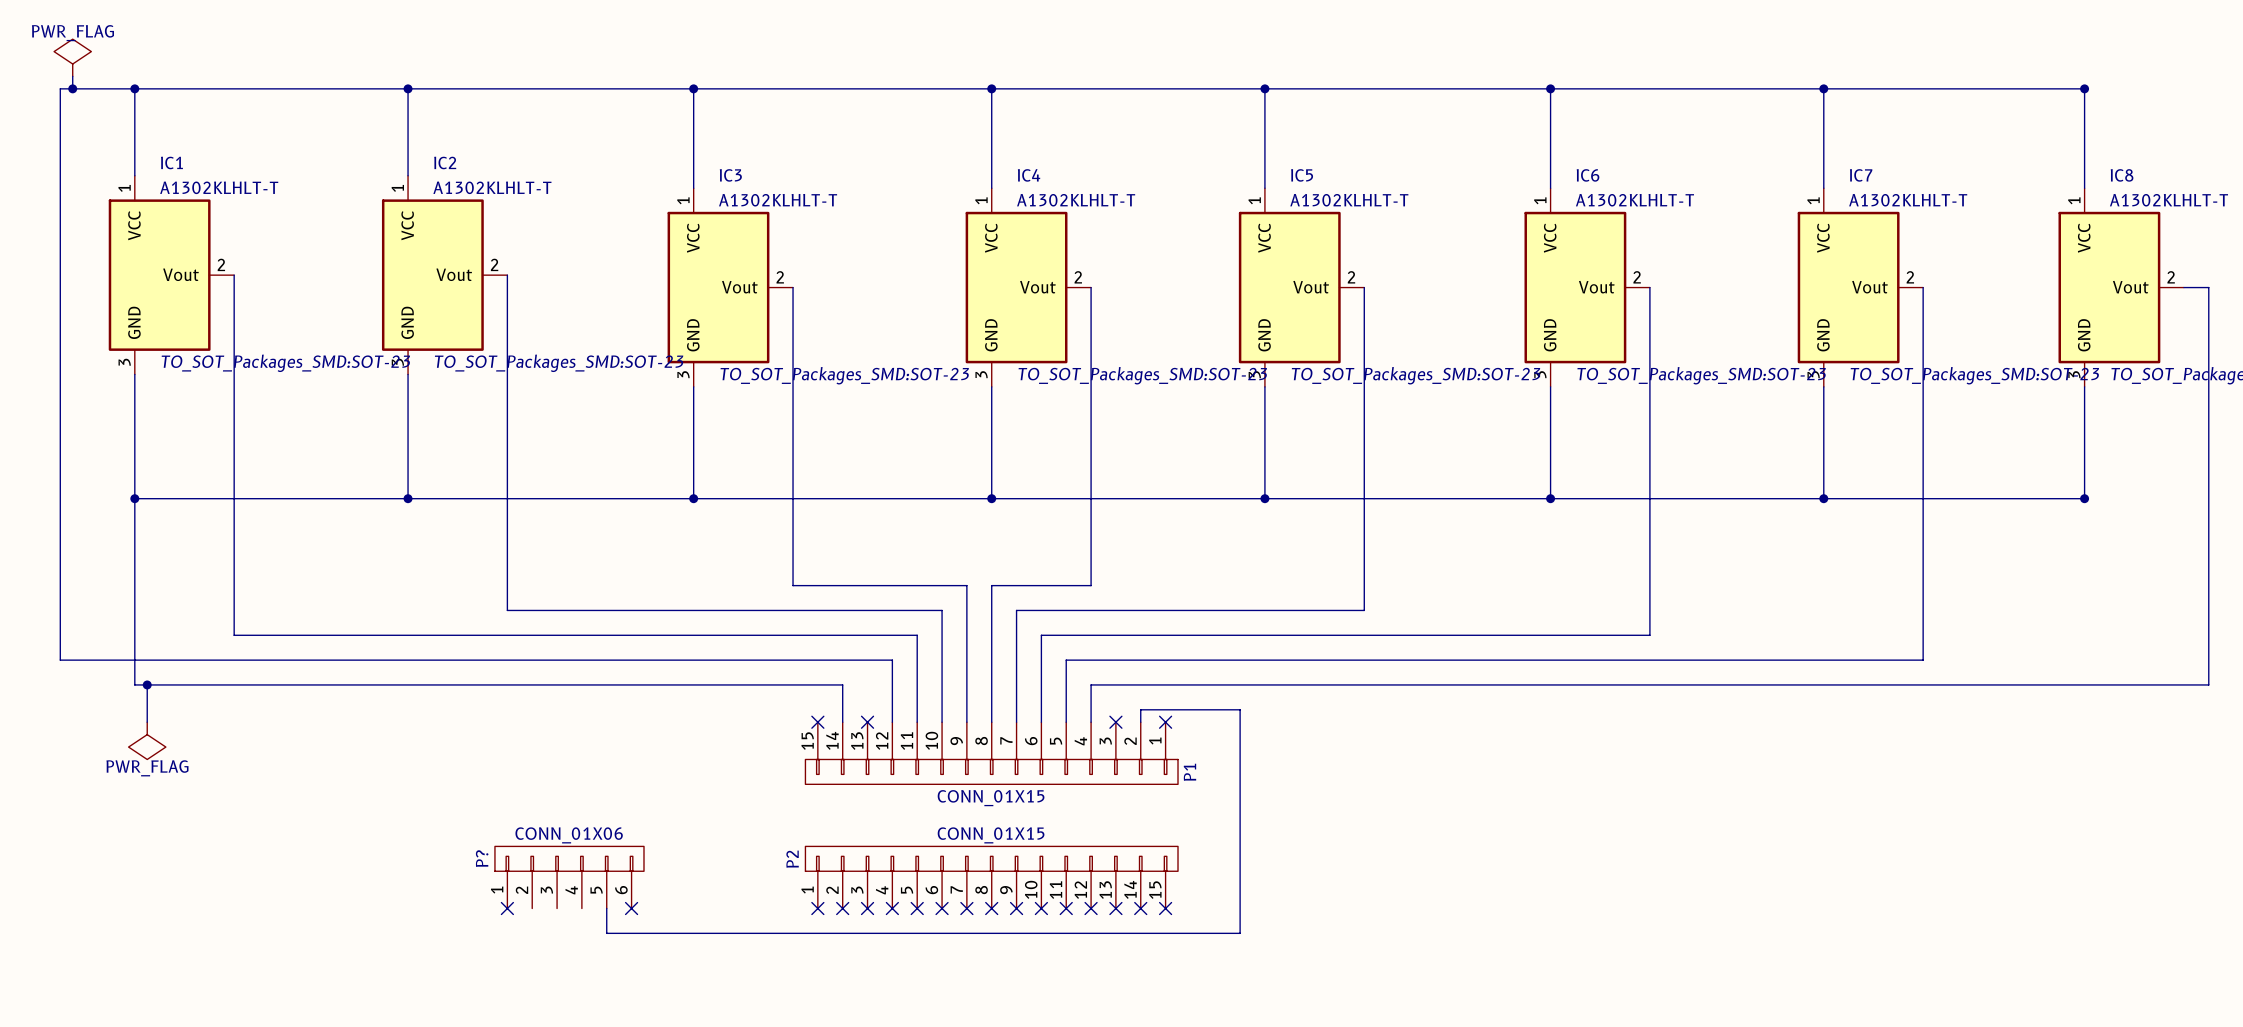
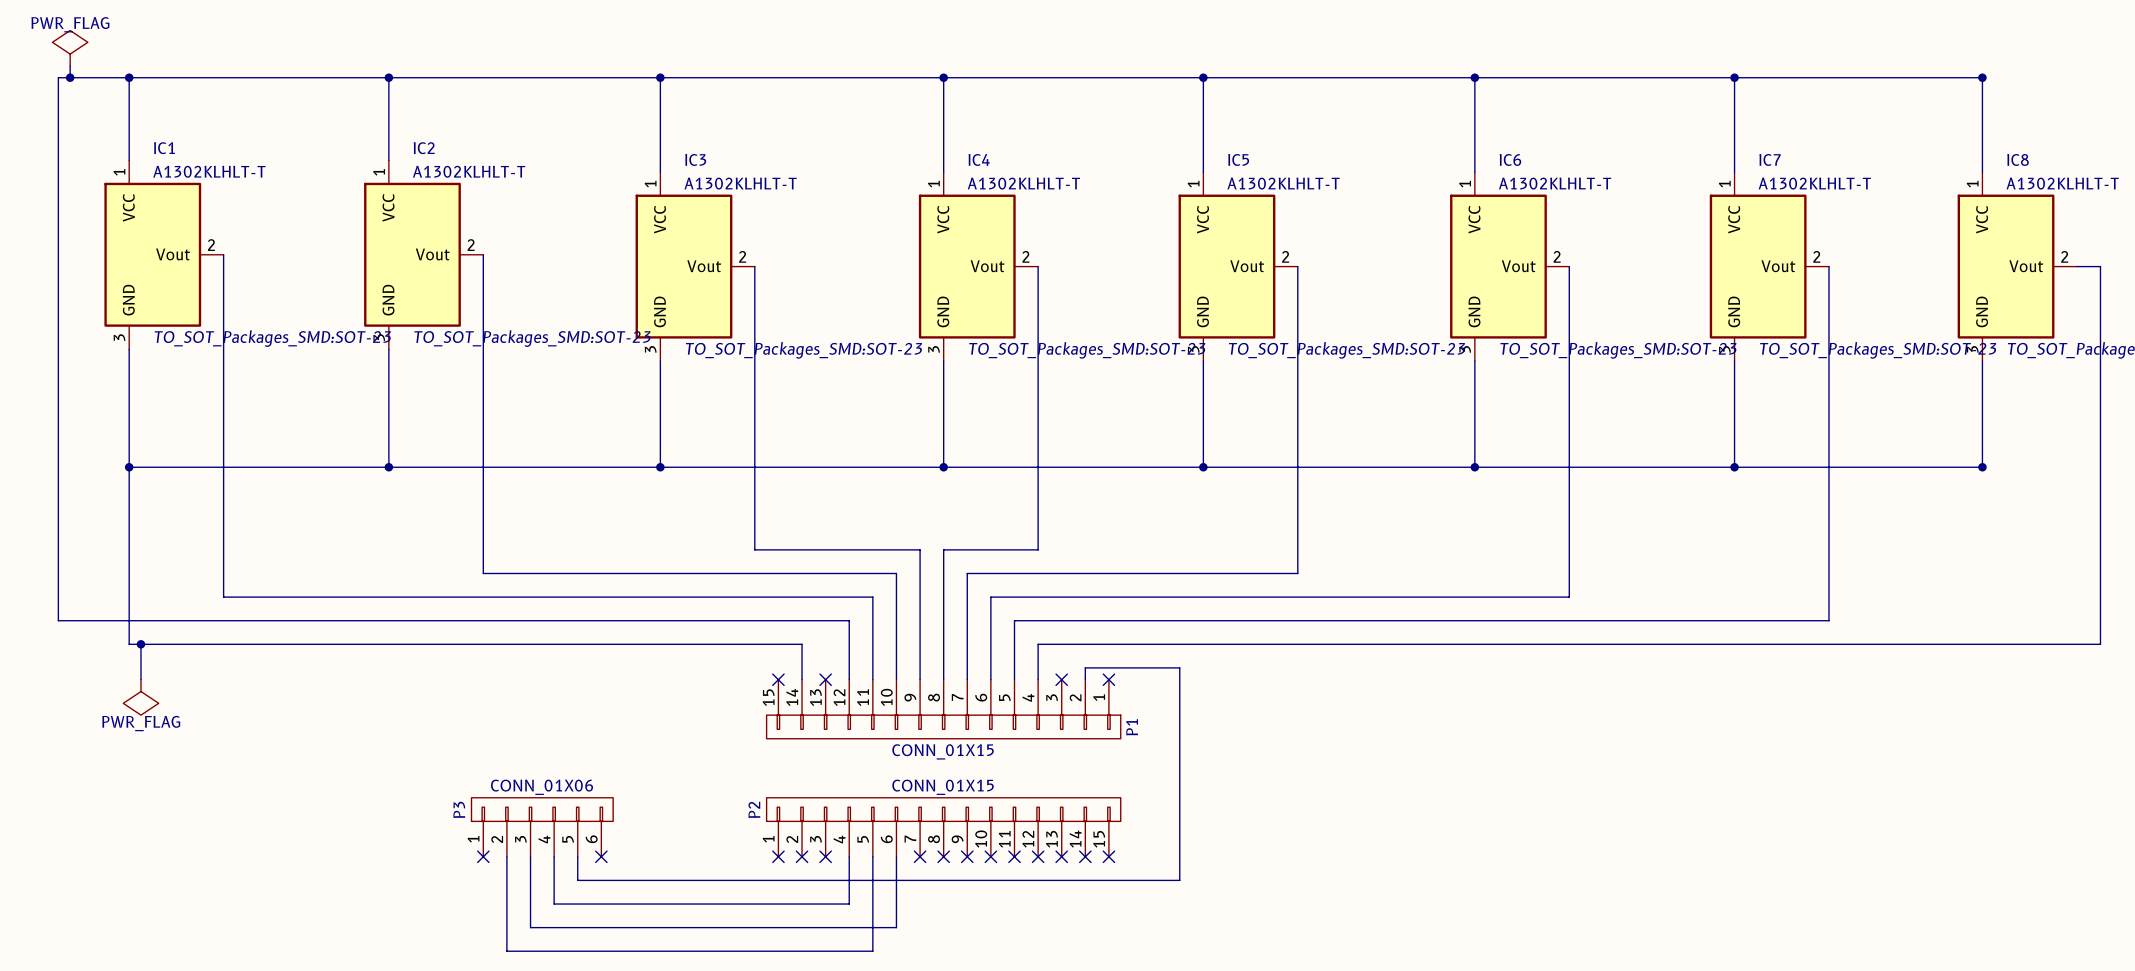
P? name: P? (482, 858) -> P3 (459, 809)
wire: none -> (506, 856) (506, 951) (872, 951) (872, 856)
wire: none -> (530, 856) (530, 927) (896, 927) (896, 856)
wire: none -> (554, 856) (554, 904) (849, 904) (849, 856)
no-connect mark: (892, 908) -> none
no-connect mark: (917, 908) -> none
no-connect mark: (942, 908) -> none

